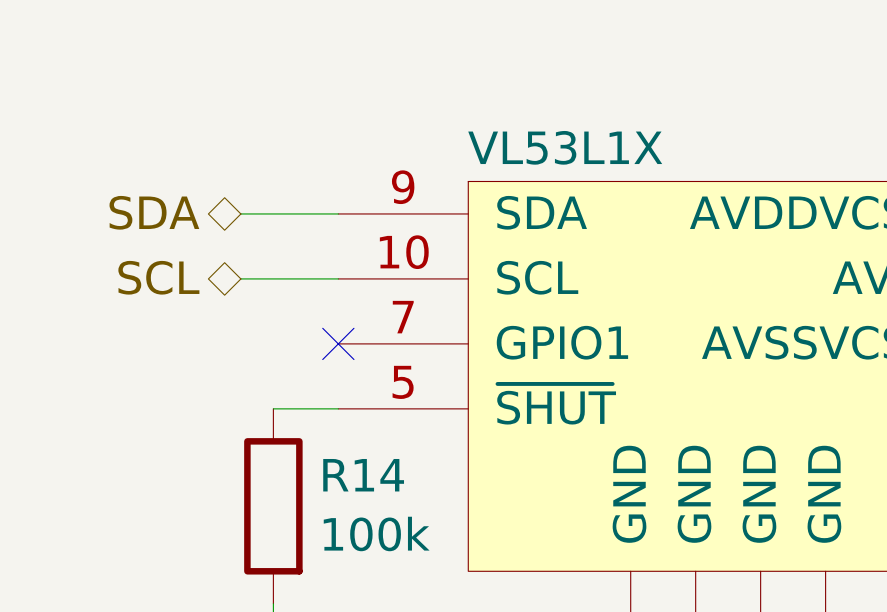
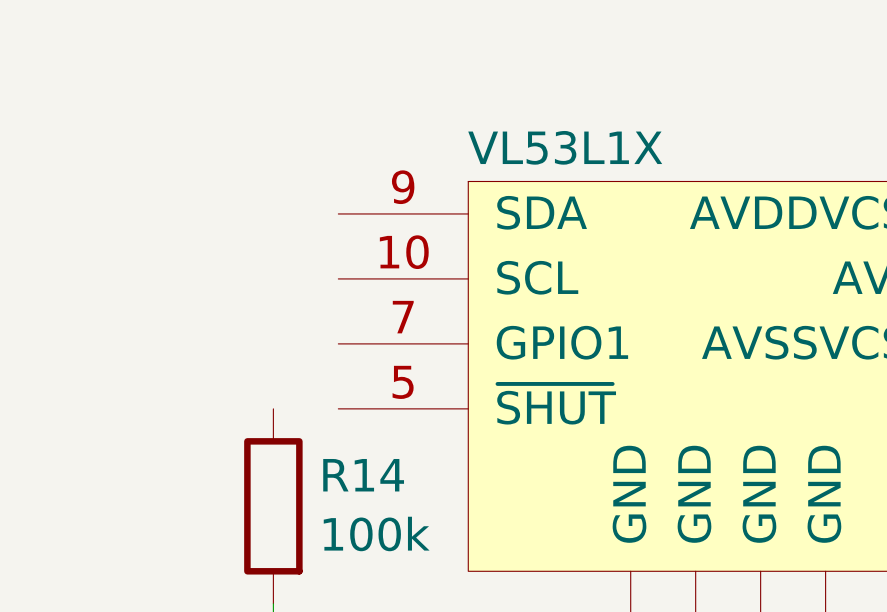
hierarchical label: SDA (154, 212) -> none
wire: (240, 213) (338, 213) -> none
hierarchical label: SCL (158, 277) -> none
wire: (240, 278) (338, 278) -> none
no-connect mark: (338, 343) -> none
wire: (273, 408) (338, 408) -> none

